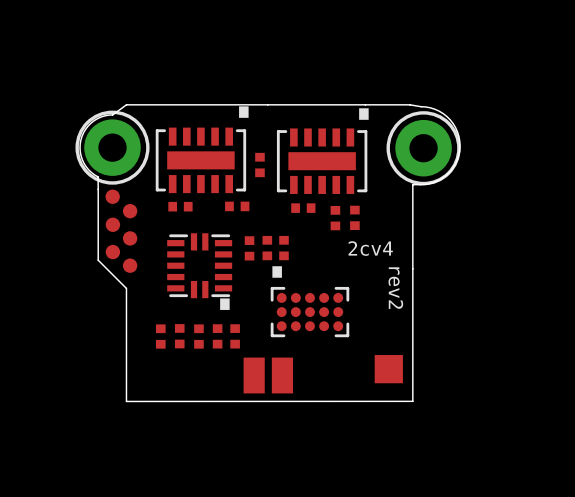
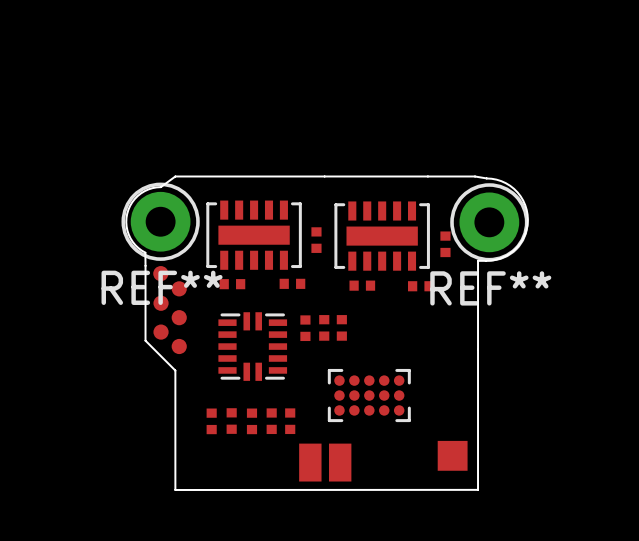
text: . (243, 112) -> none
text: . (363, 114) -> none
REF** name: none -> REF** (162, 287)
REF** name: none -> REF** (490, 288)
part rotation: 0° (354, 217) -> 90° clockwise (420, 286)
part position: (335, 218) -> (445, 244)
text: 2cv4 (370, 248) -> none
text: . (277, 271) -> none
text: rev2 (395, 288) -> none
text: . (224, 304) -> none

